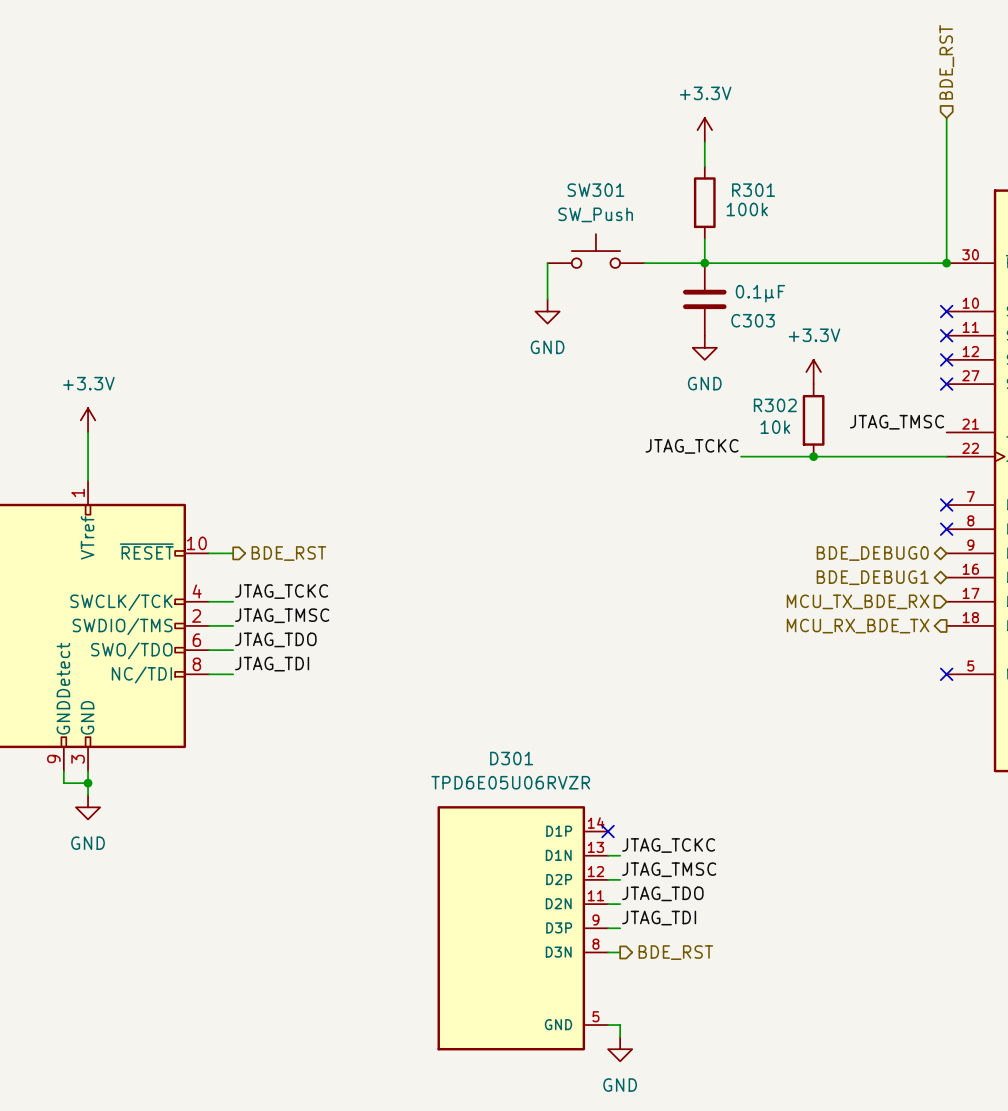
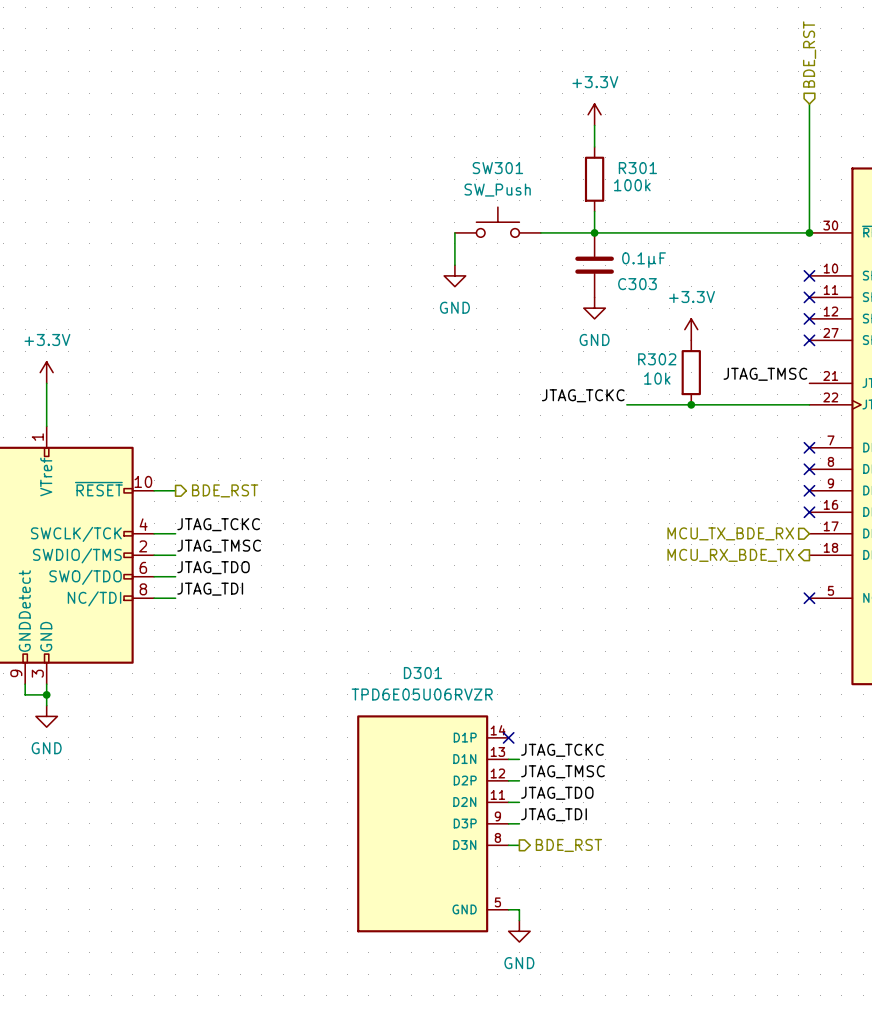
hierarchical label: BDE_DEBUG0 (872, 553) -> none
no-connect mark: none -> (809, 490)
hierarchical label: BDE_DEBUG1 (872, 577) -> none
no-connect mark: none -> (809, 512)

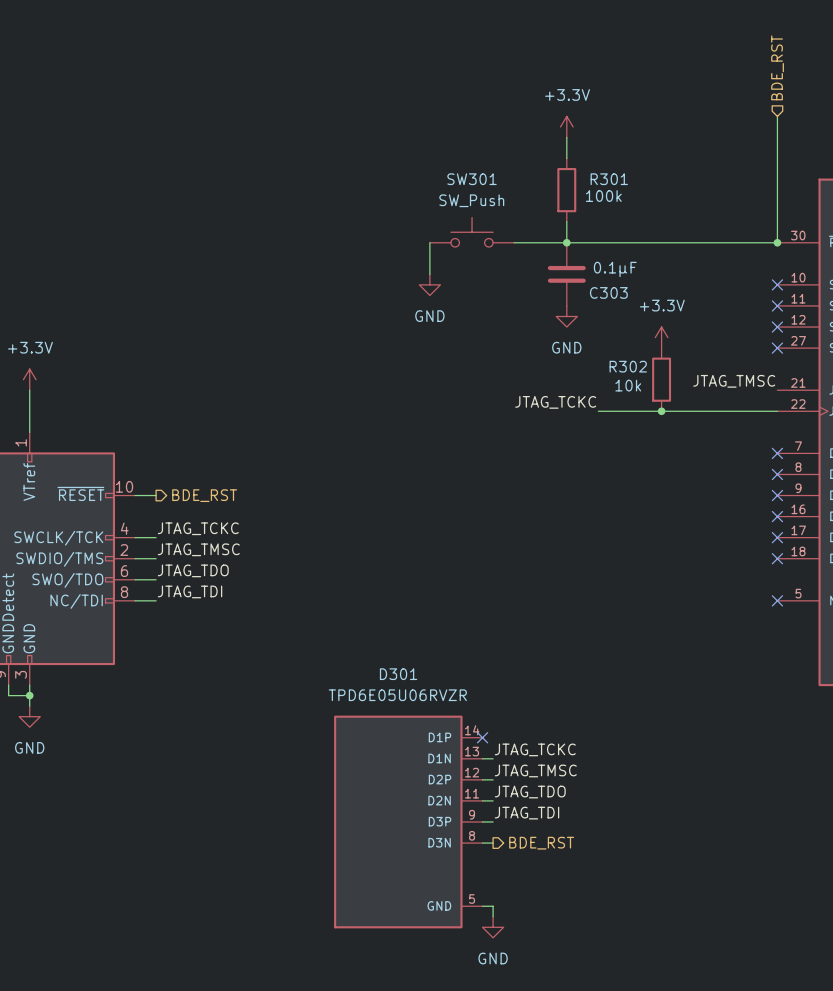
hierarchical label: MCU_TX_BDE_RX (730, 533) -> none
no-connect mark: none -> (777, 537)
hierarchical label: MCU_RX_BDE_TX (730, 555) -> none
no-connect mark: none -> (777, 558)

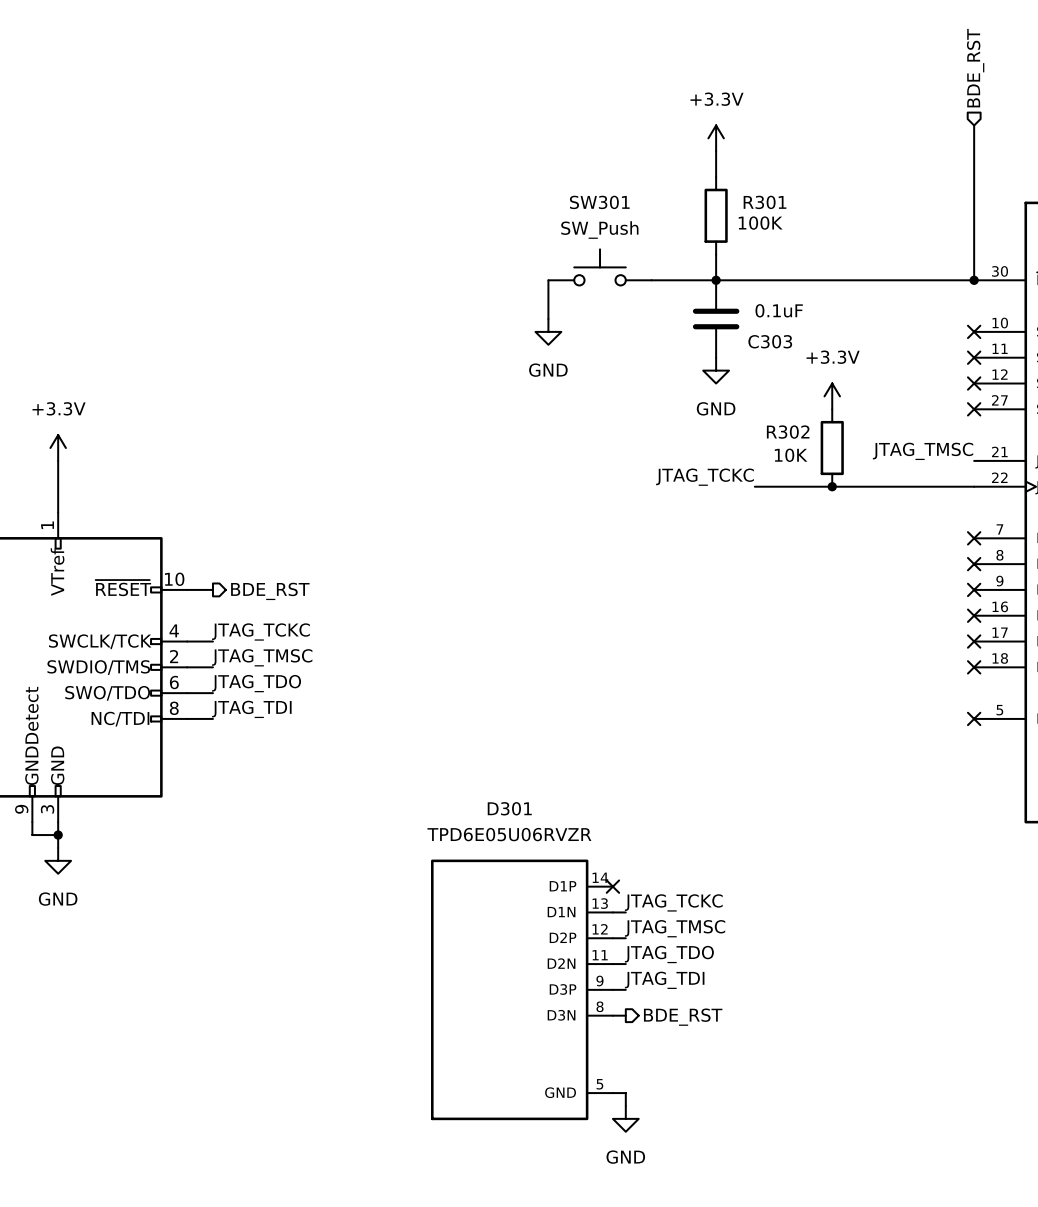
R301 value: 100k (603, 196) -> 100K (760, 223)
C303 value: 0.1µF (615, 269) -> 0.1uF (779, 310)
R302 value: 10k (628, 385) -> 10K (791, 455)

